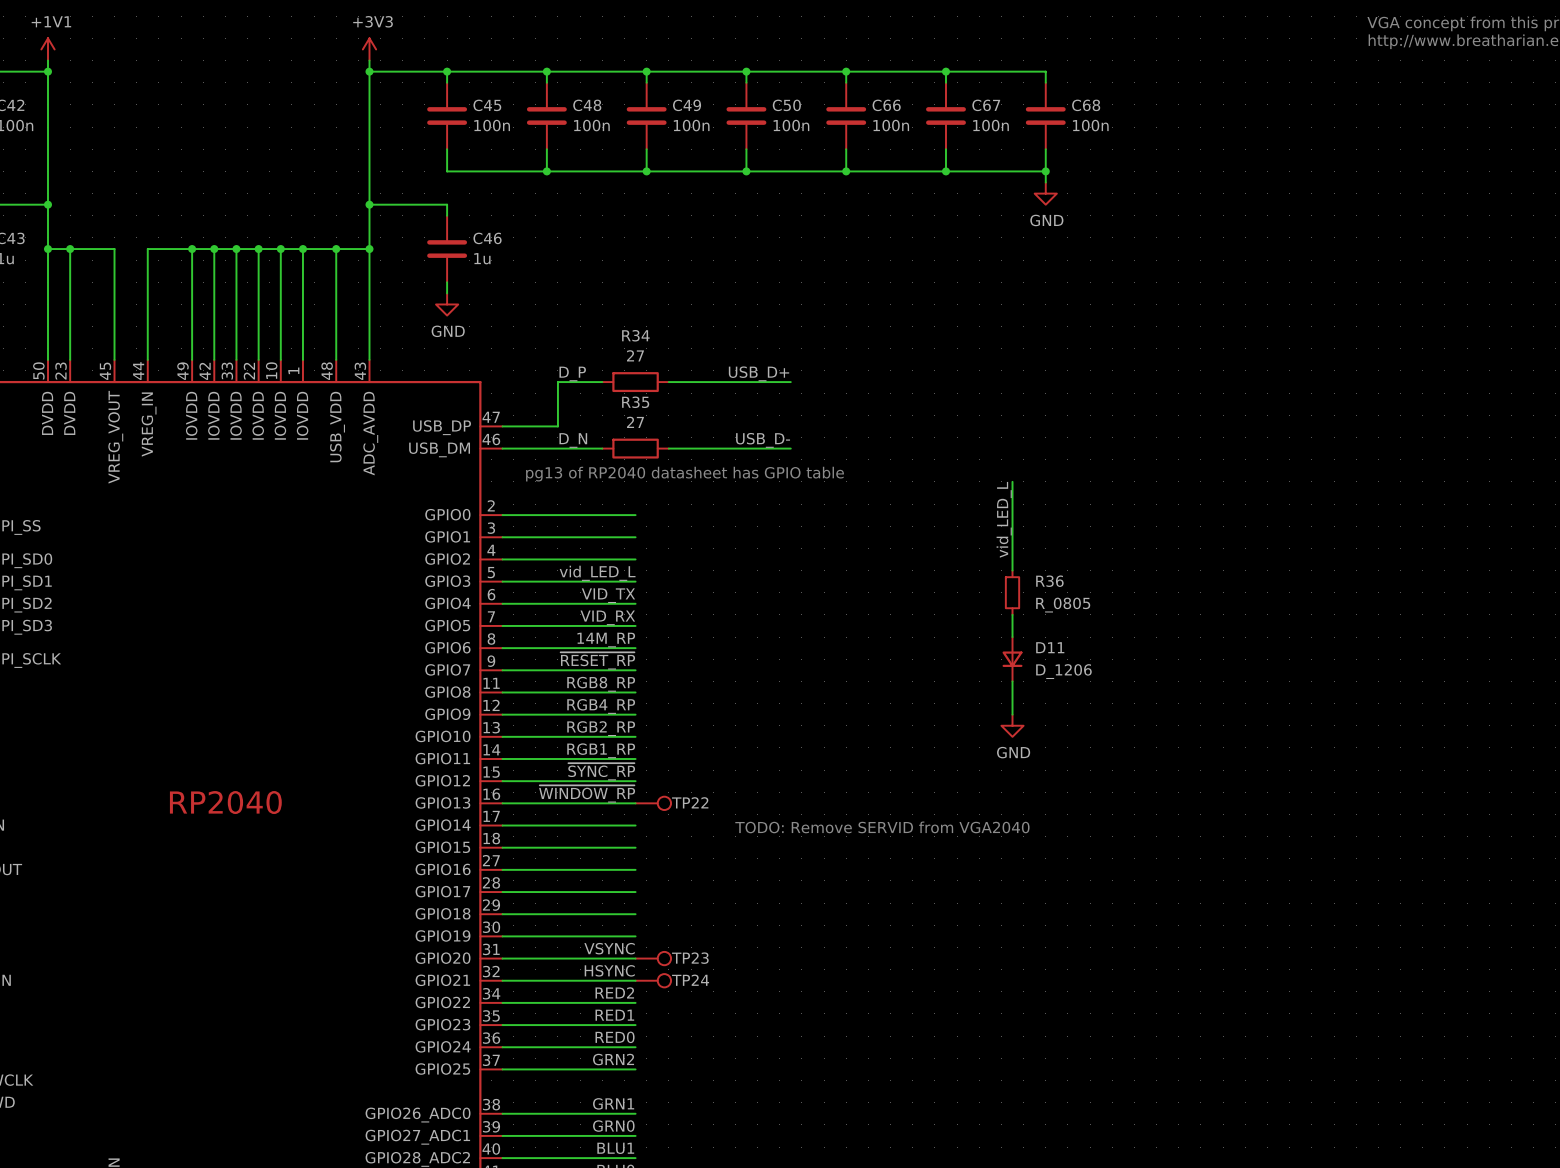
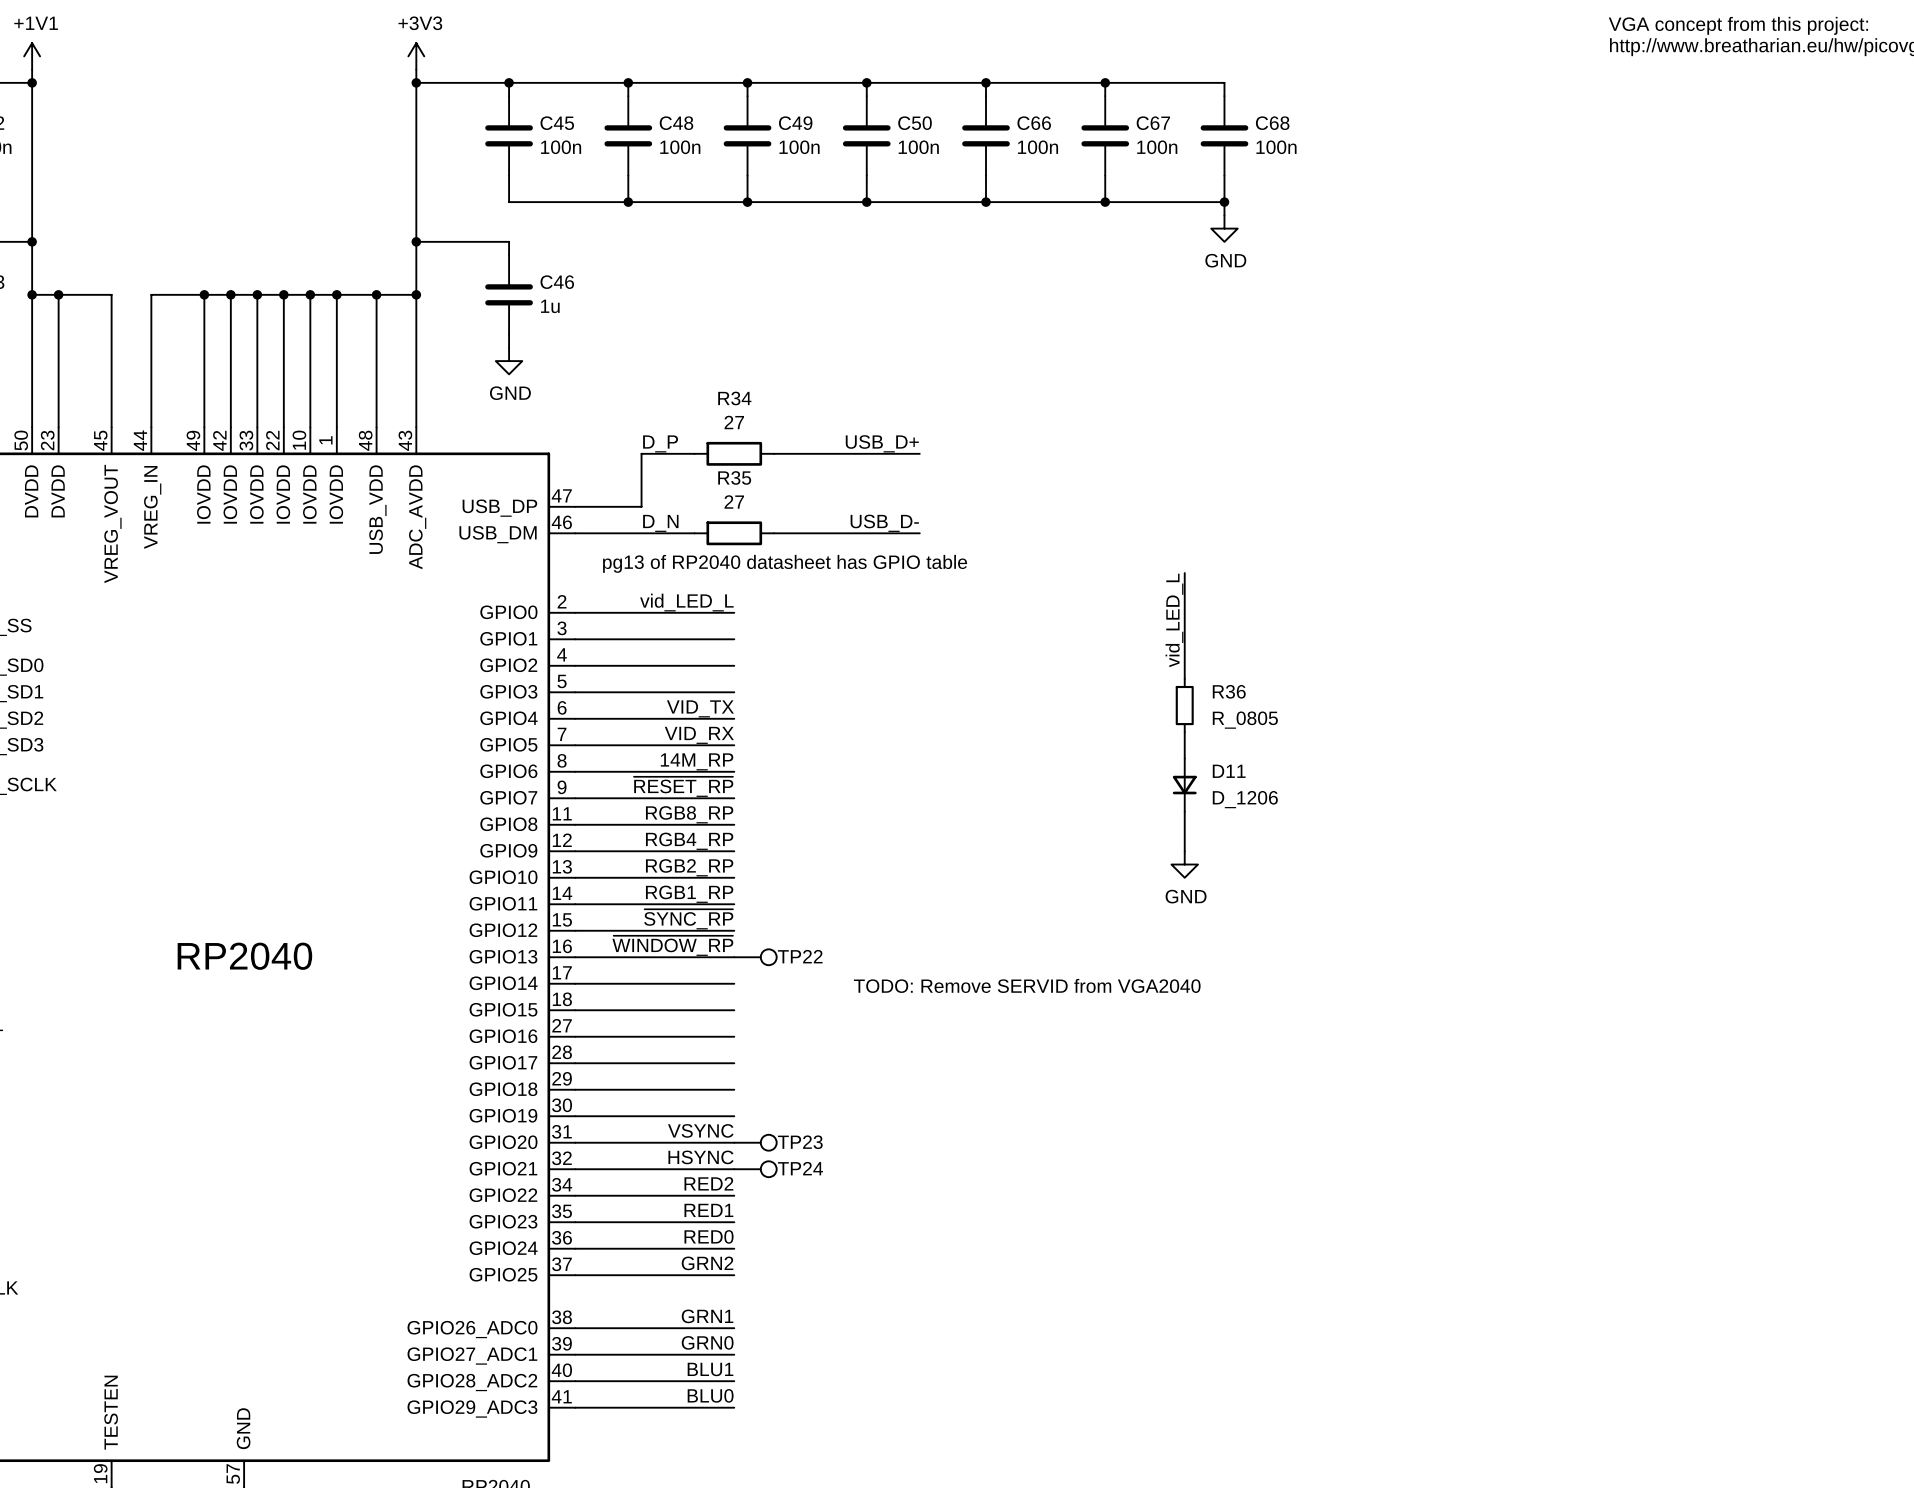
label position: vid_LED_L (597, 573) -> vid_LED_L (686, 602)

